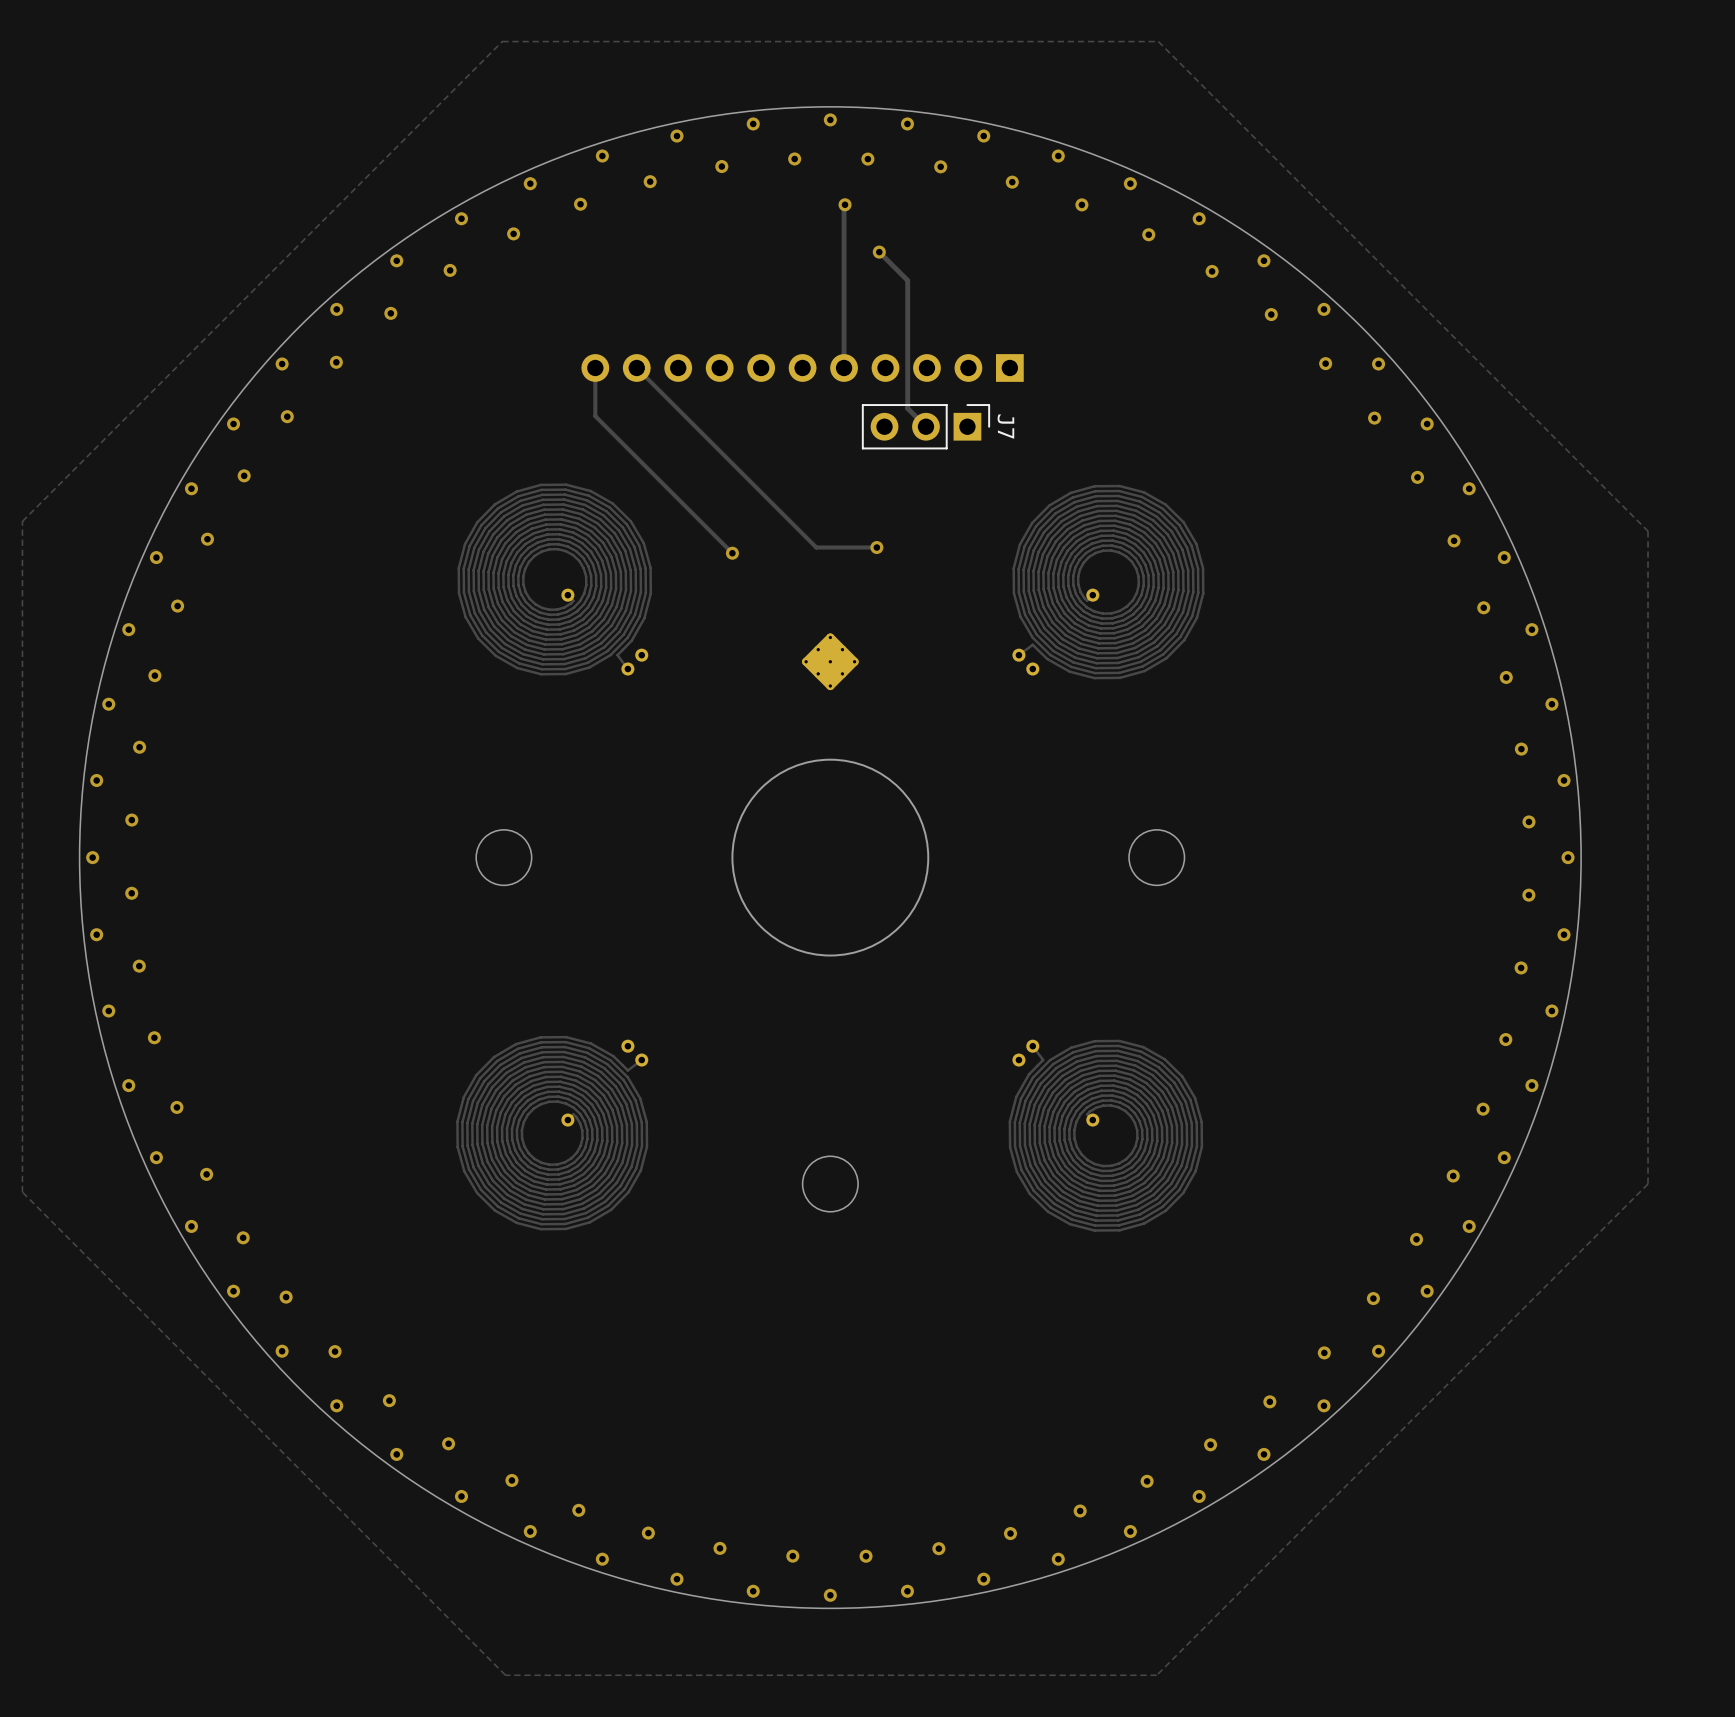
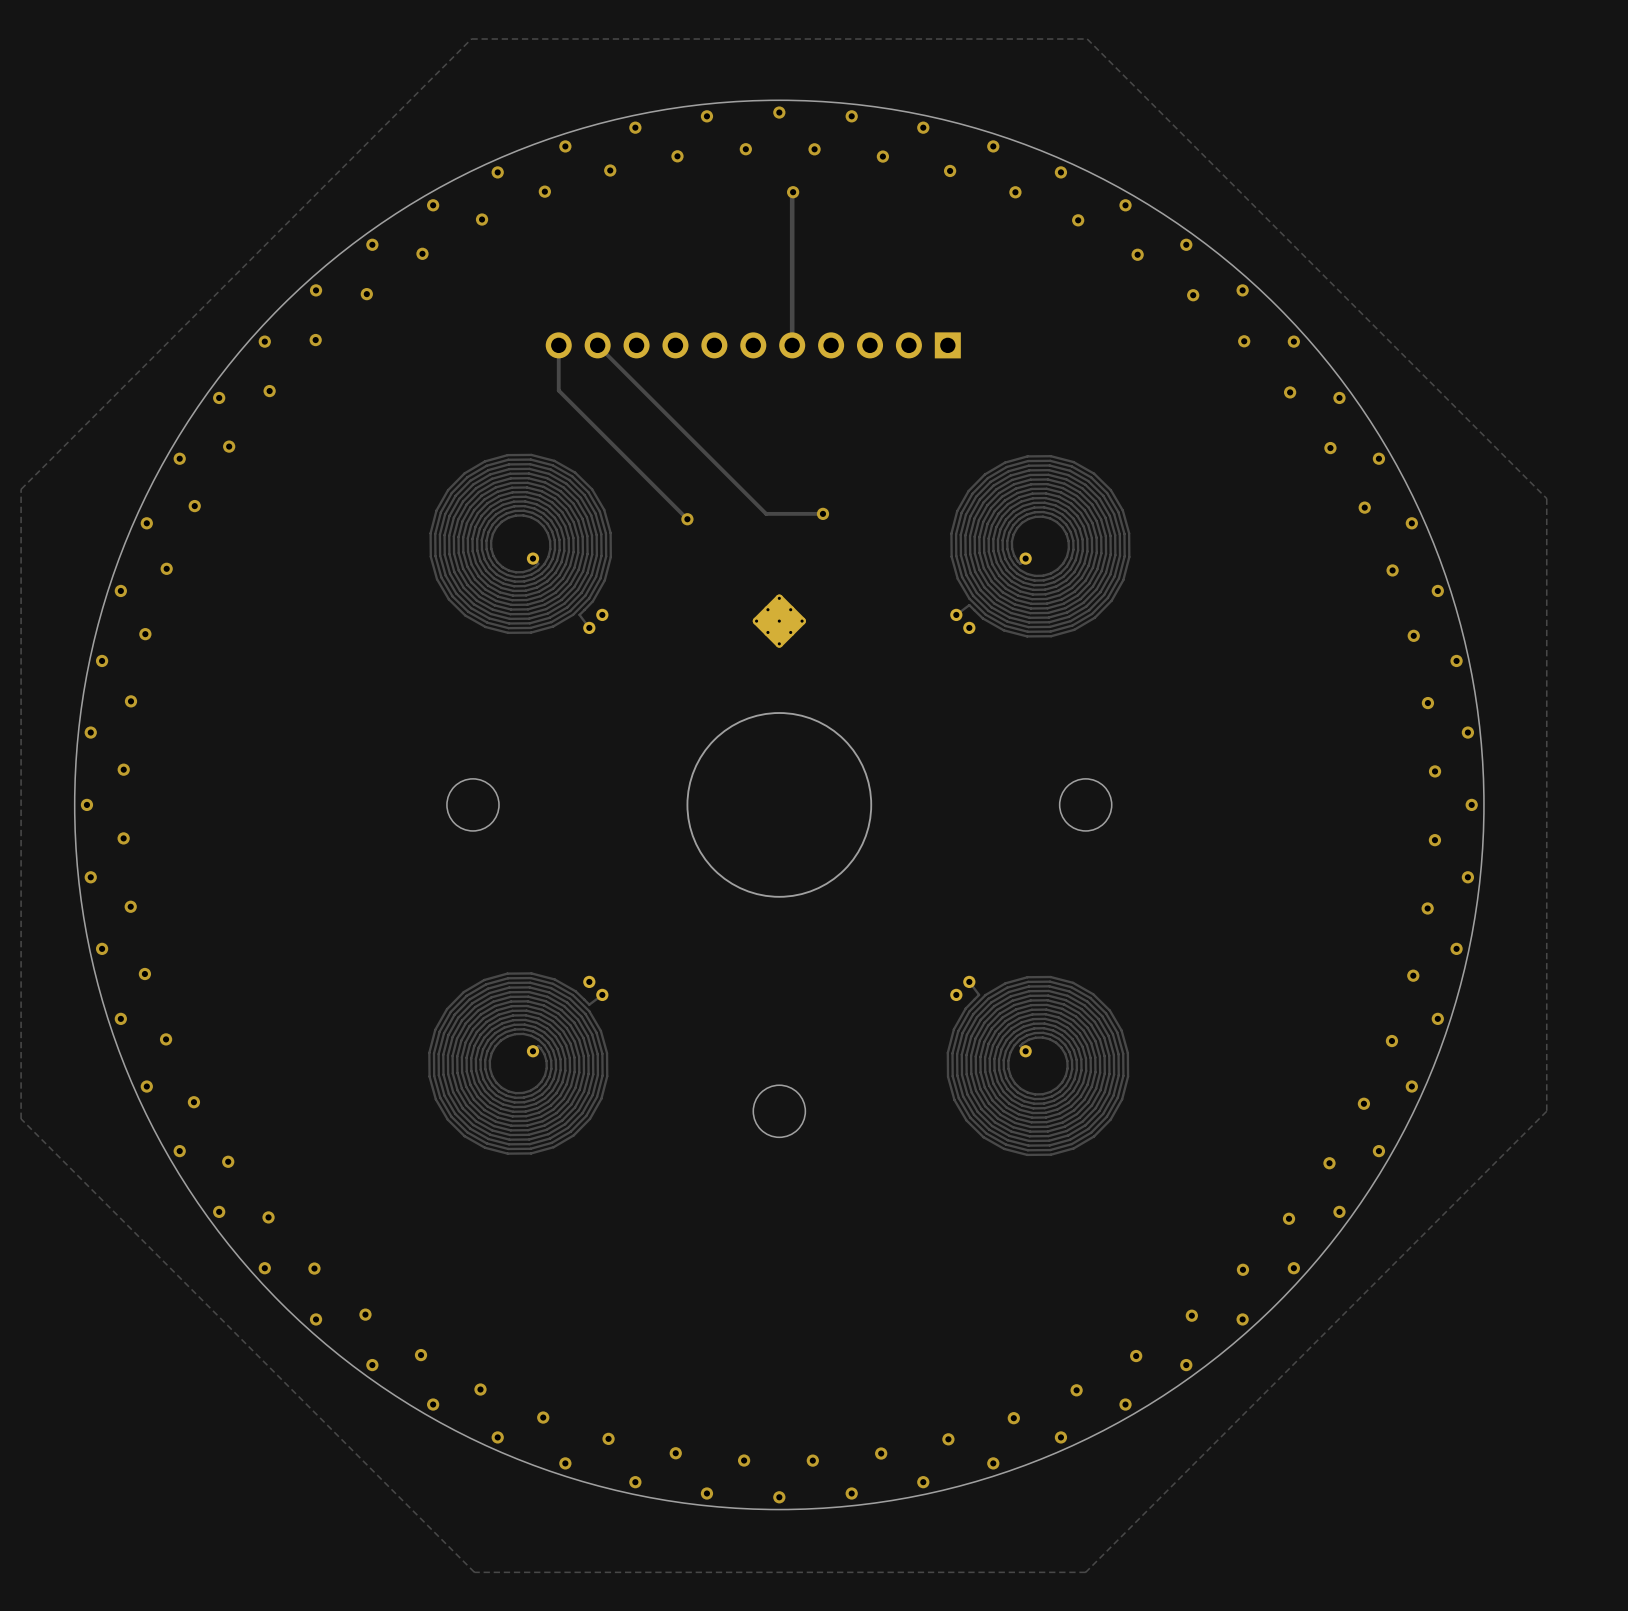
track: (879, 252) (907, 280) (907, 408) (925, 426) -> none
via: (879, 252) -> none
J7: (925, 426) -> none

